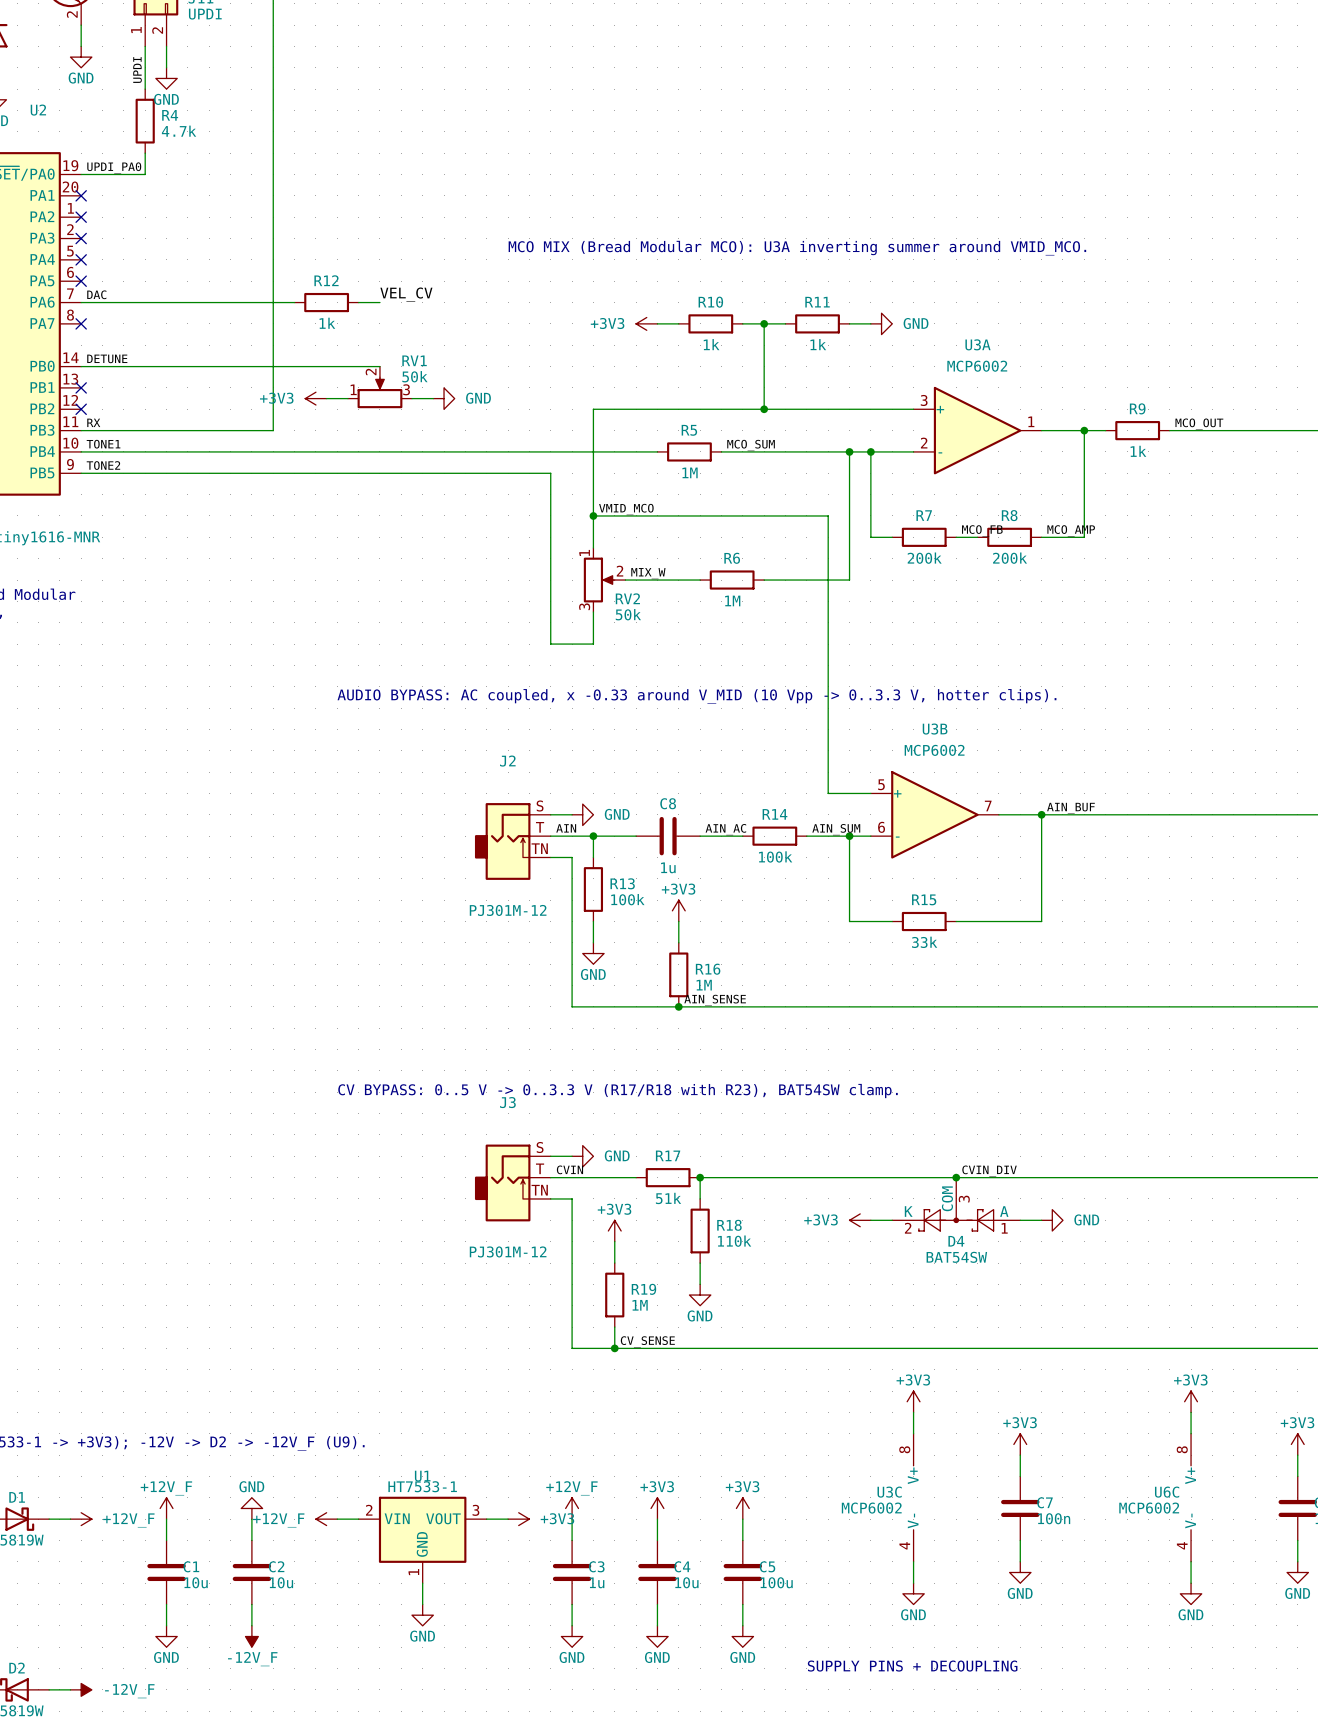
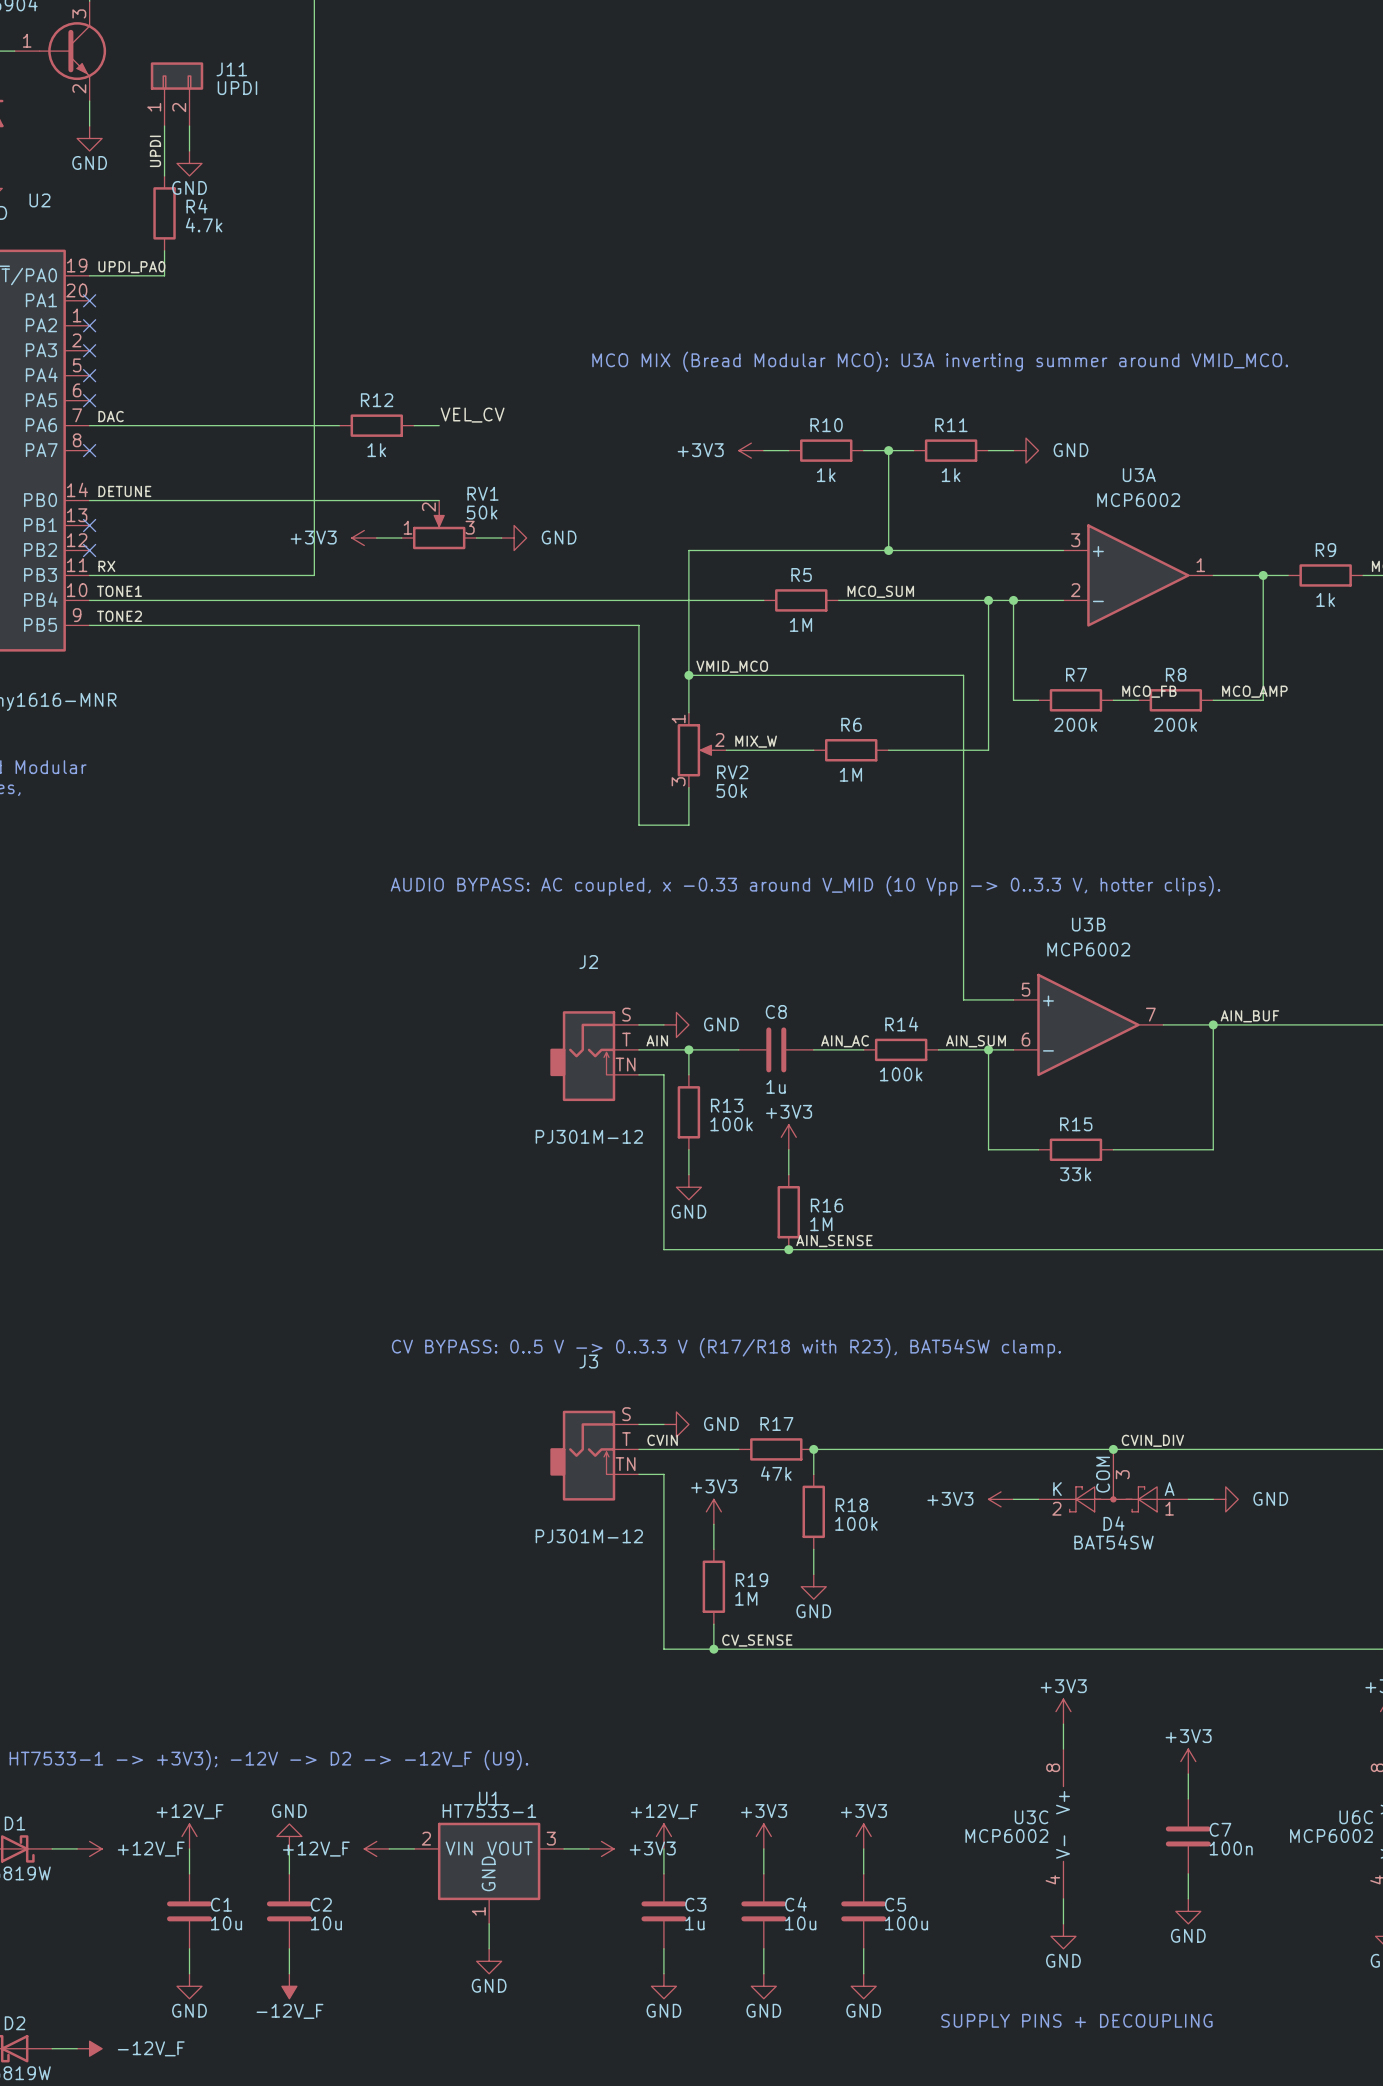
R17 value: 51k (668, 1198) -> 47k (776, 1473)
R18 value: 110k (734, 1241) -> 100k (856, 1523)

